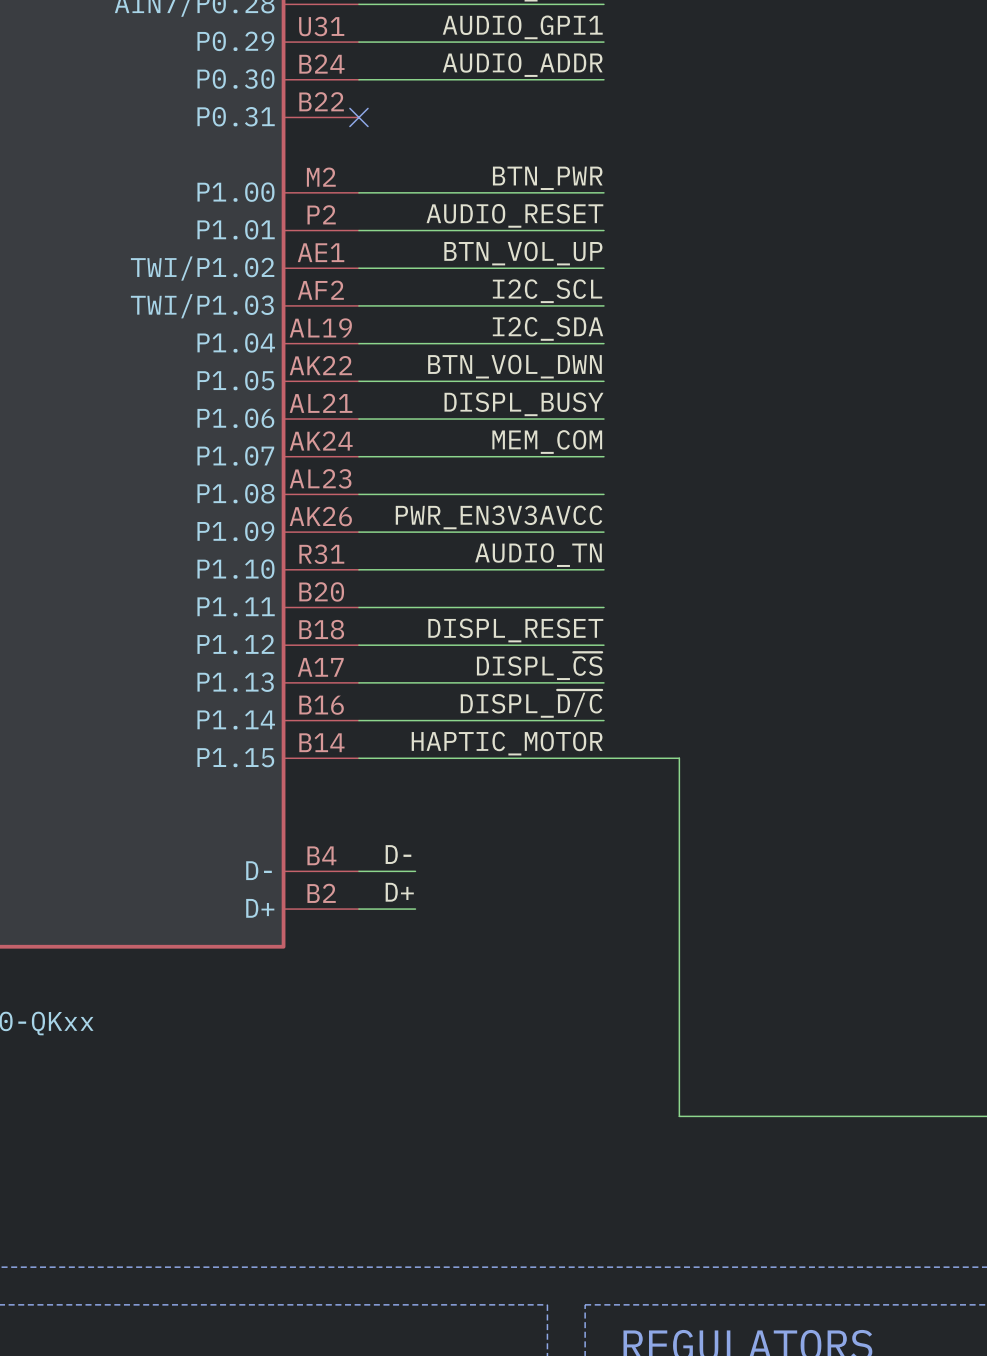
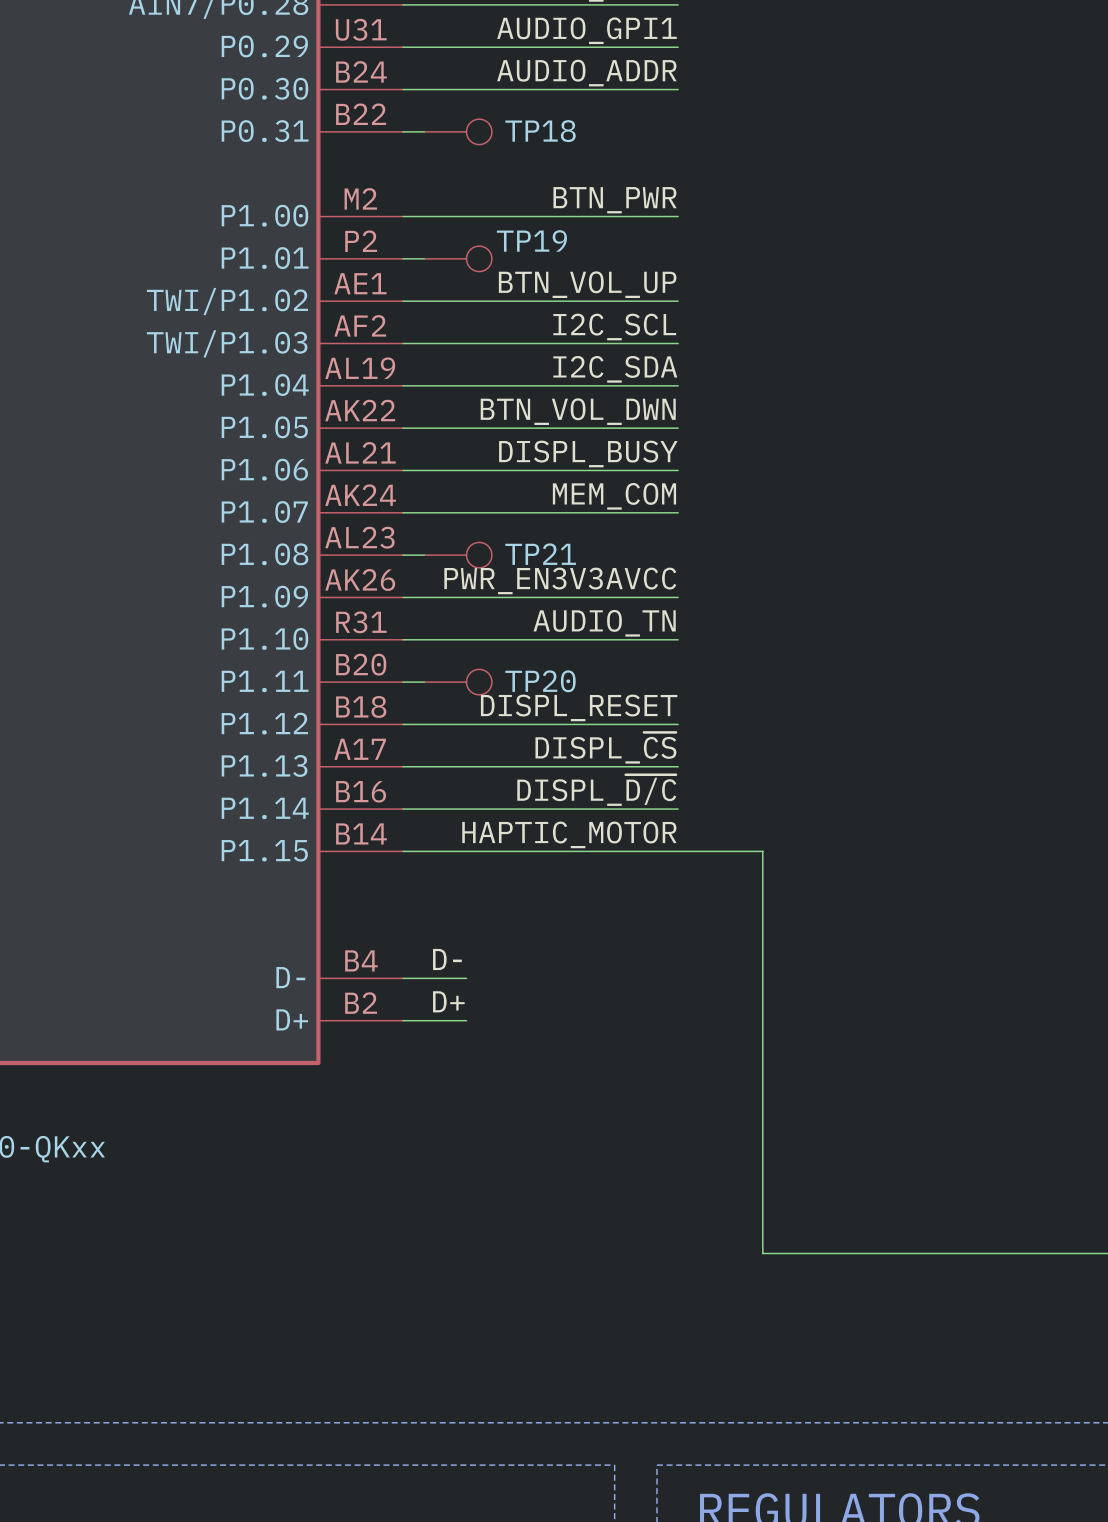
wire: none -> (403, 131) (424, 131)
no-connect mark: (358, 117) -> none
TP18: none -> (458, 131)
label: AUDIO_RESET (514, 215) -> none
wire: (377, 230) (603, 230) -> none
TP19: none -> (458, 258)
wire: (377, 494) (603, 494) -> none
TP21: none -> (458, 555)
wire: (377, 607) (603, 607) -> none
TP20: none -> (458, 682)

